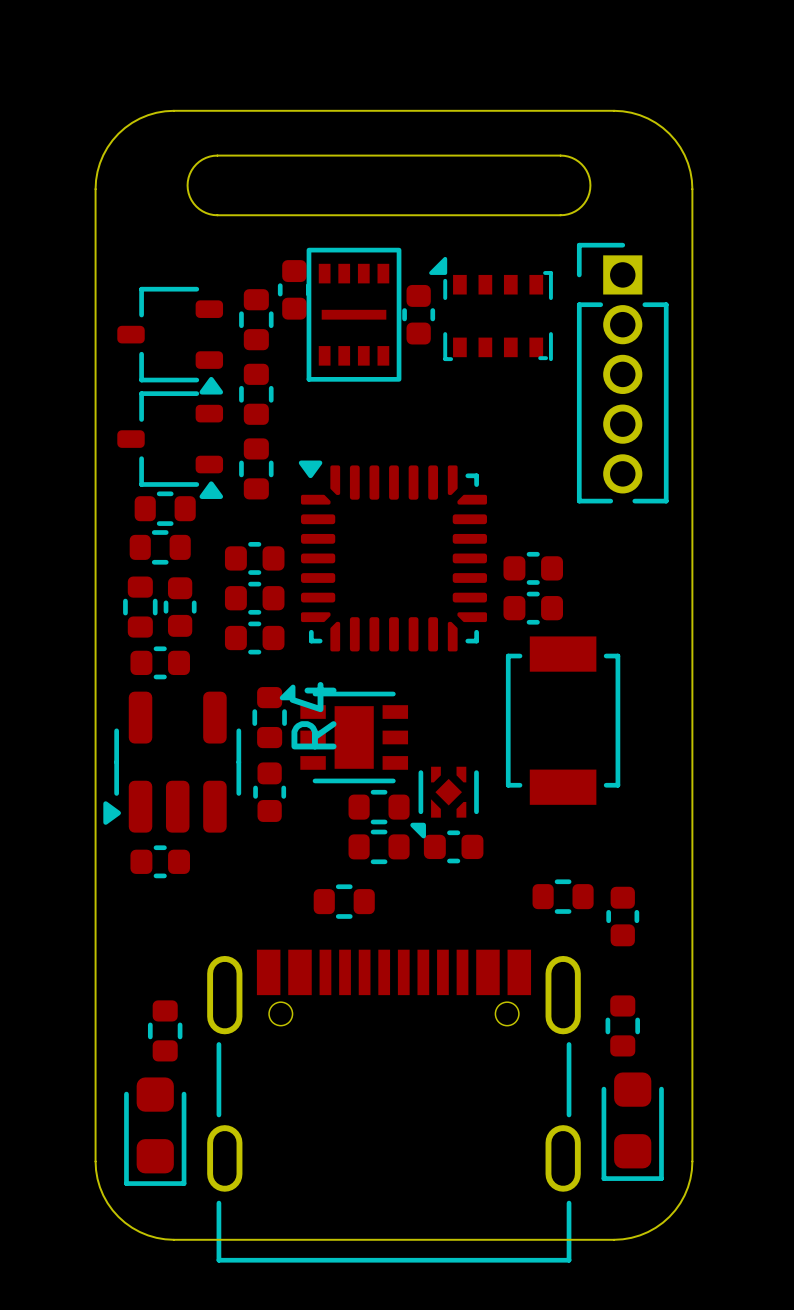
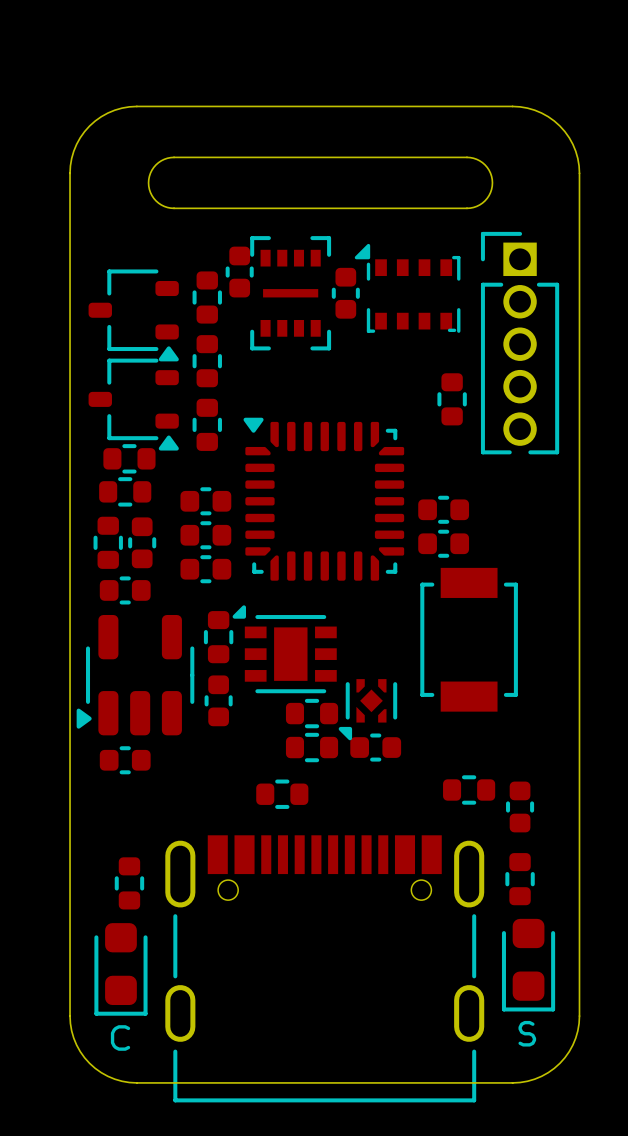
board edge: (95, 189) (97, 171) (103, 155) (118, 133) (139, 118) (156, 112) (173, 110) (622, 111) (648, 118) (669, 133) (684, 155) (690, 171) (692, 189) -> (70, 186) (71, 158) (76, 144) (84, 131) (95, 121) (107, 113) (122, 108) (136, 106) (512, 106) (527, 108) (548, 116) (559, 126) (569, 137) (577, 158) (579, 186)
part footprint: [306, 247, 402, 382] -> [250, 236, 332, 351]
part: none -> (452, 399)
part footprint: [279, 684, 409, 784] -> [232, 605, 337, 694]
R4 name: R4 (313, 715) -> none
part position: (622, 1025) -> (520, 879)
part position: (165, 1030) -> (129, 883)
part position: (632, 1126) -> (528, 965)
part position: (155, 1131) -> (120, 969)
text: none -> s (527, 1033)
text: none -> c (120, 1037)

